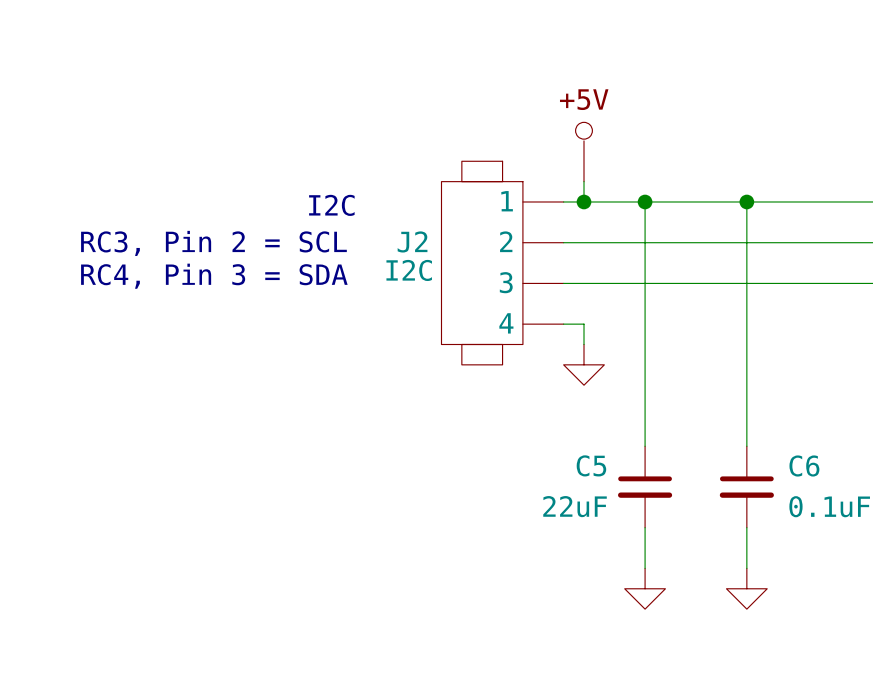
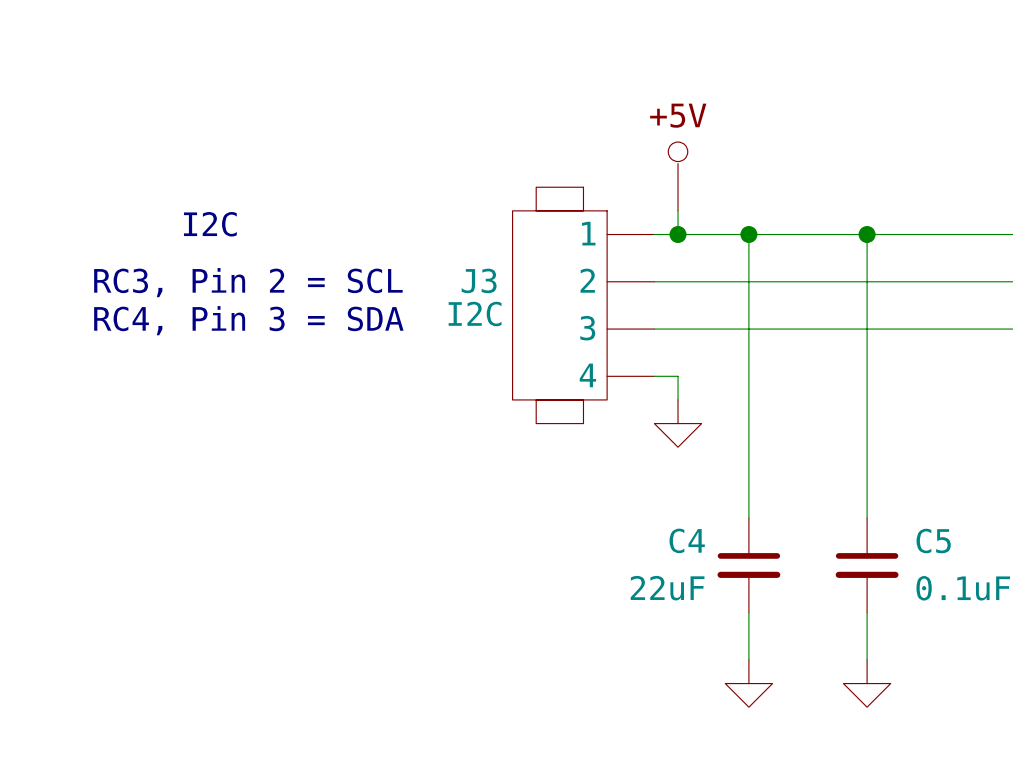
text position: I2C (331, 205) -> I2C (210, 224)
J2 name: J2 (412, 241) -> J3 (479, 280)
C5 name: C5 (591, 465) -> C4 (687, 540)
C6 name: C6 (804, 465) -> C5 (933, 541)

